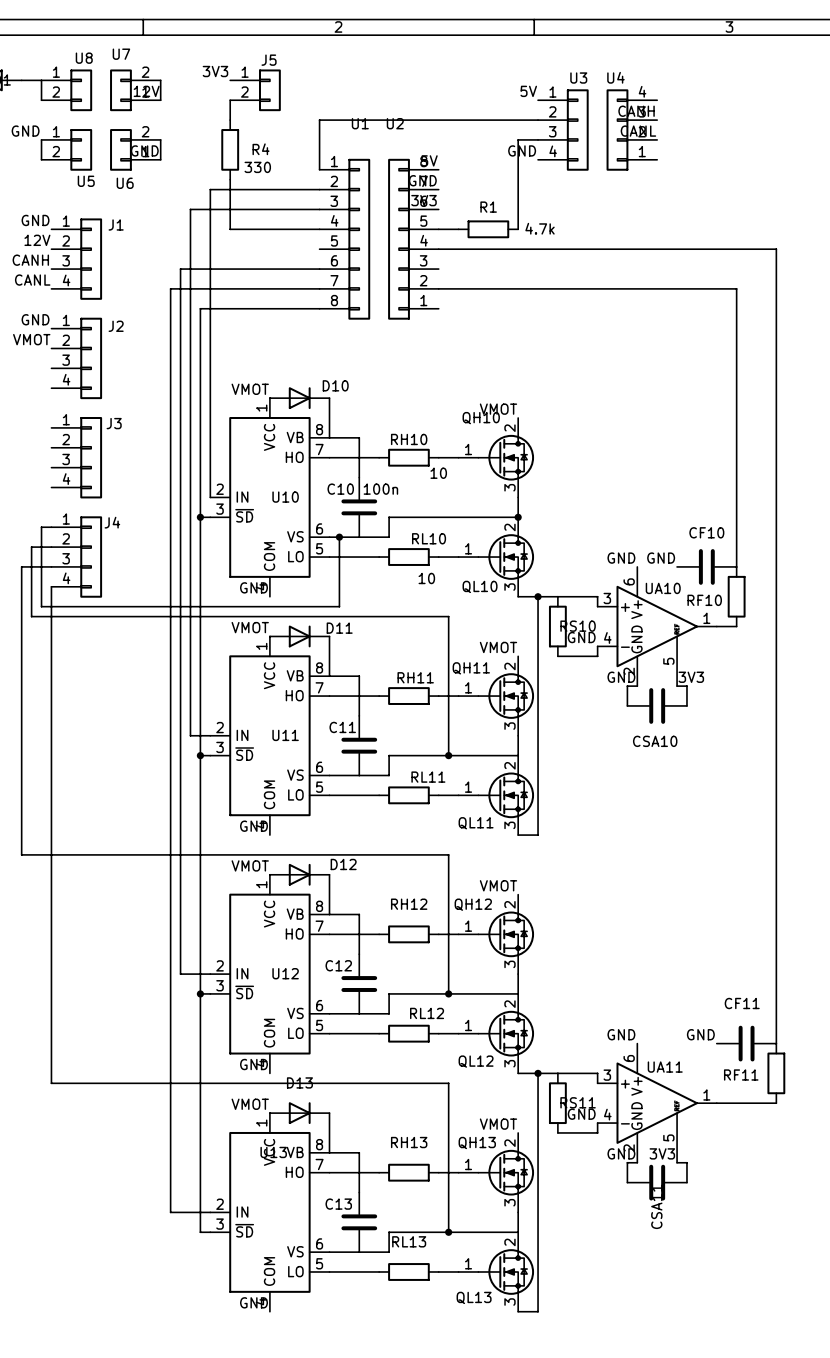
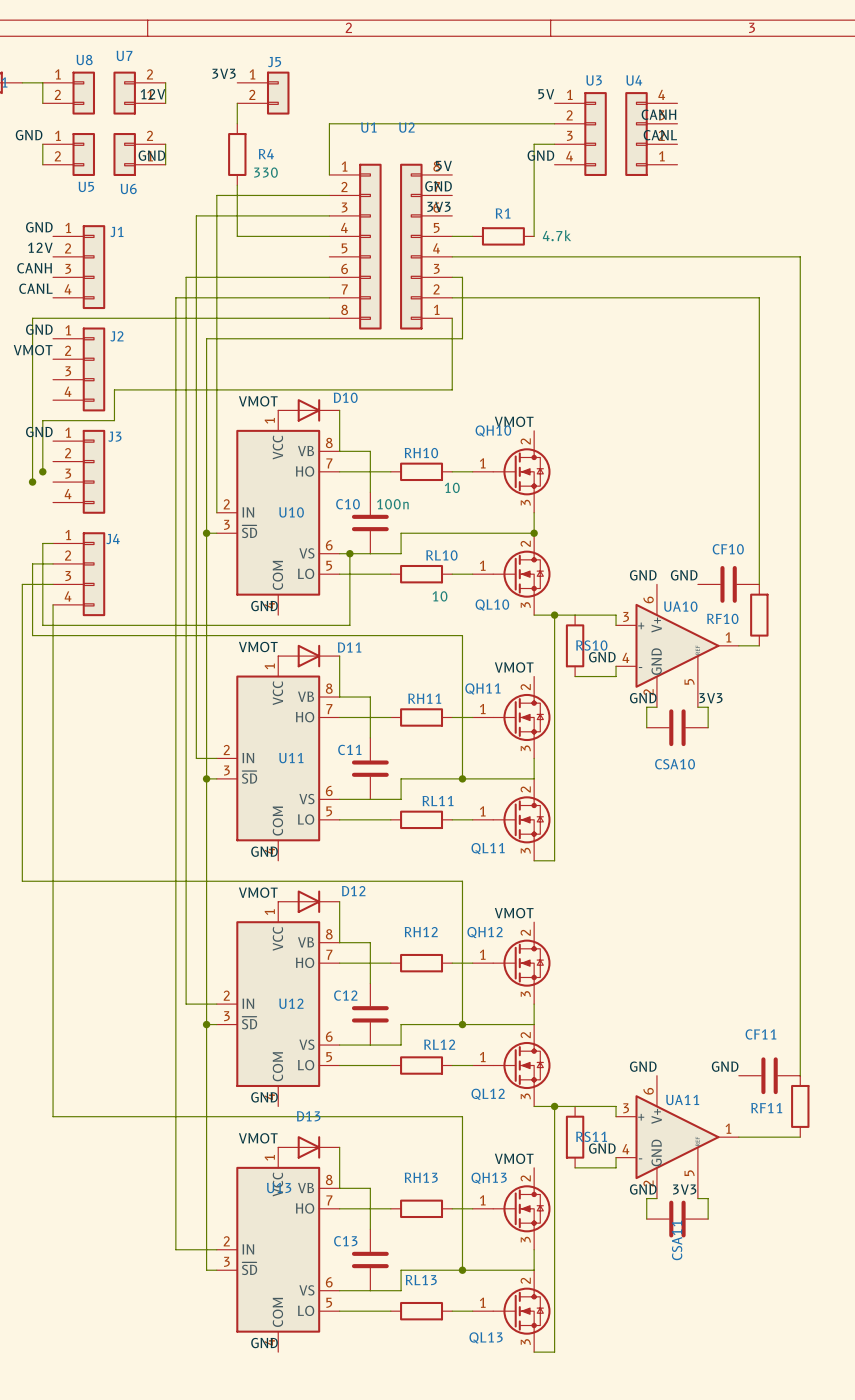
wire: none -> (452, 277) (462, 277) (462, 338) (206, 338)
wire: (200, 308) (200, 328) -> (206, 318) (32, 318) (32, 482)
wire: none -> (452, 318) (452, 389) (114, 389) (114, 420) (42, 420) (42, 471)
label: none -> GND (39, 432)
junction: none -> (42, 471)
junction: none -> (32, 482)

